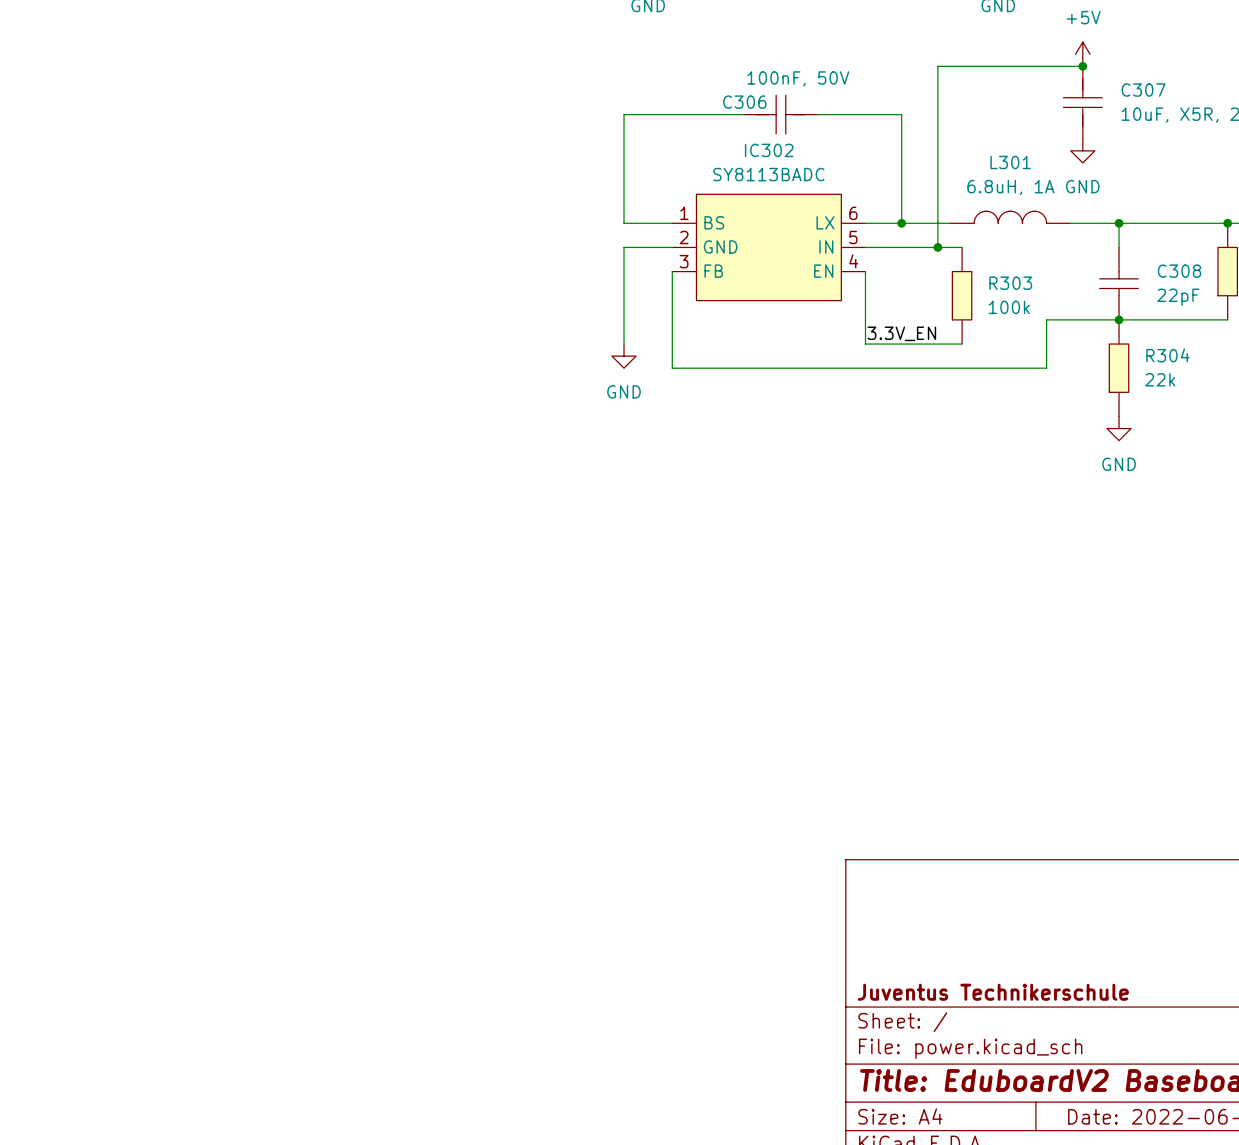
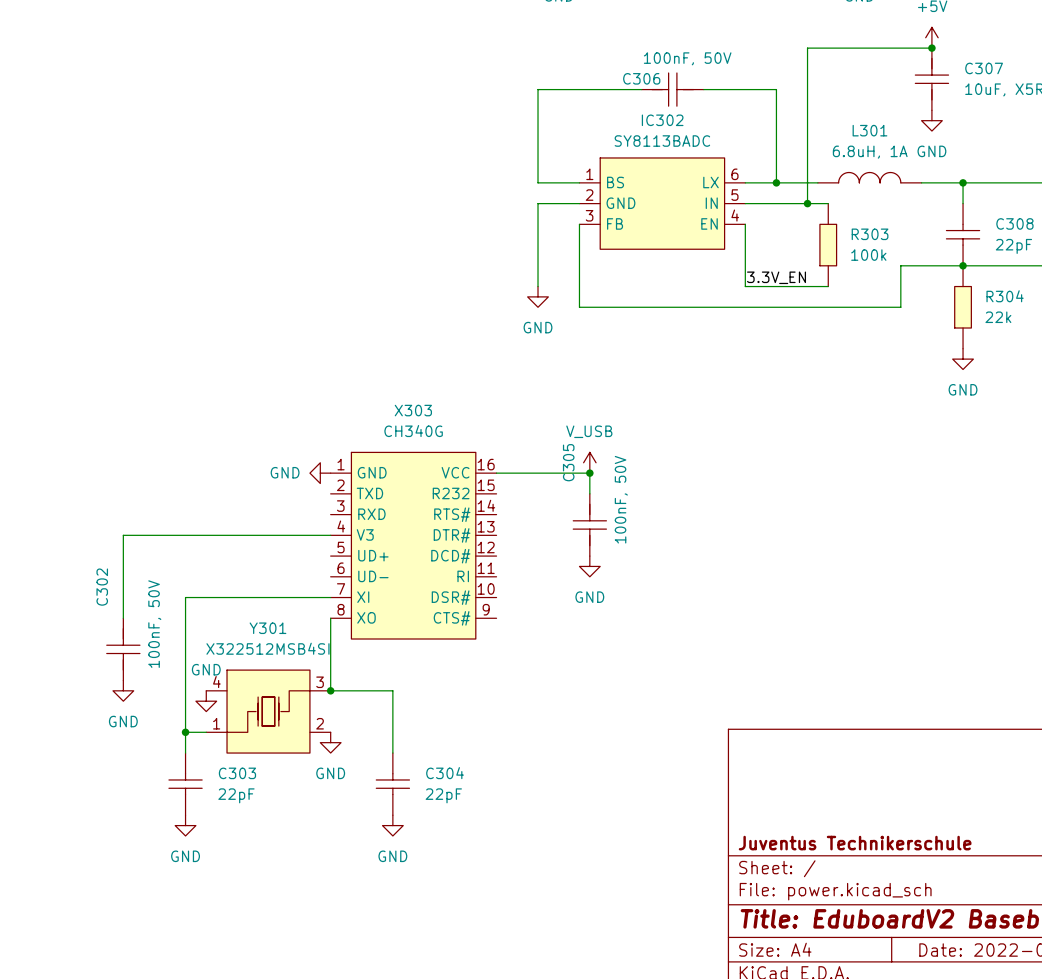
power symbol: none -> V_USB (589, 462)
power symbol: none -> GND (320, 473)
wire: none -> (496, 473) (589, 473) (589, 493)
junction: none -> (589, 473)
C305: none -> 100nF, 50V (589, 524)
wire: none -> (330, 535) (123, 535) (123, 618)
X303: none -> CH340G (413, 545)
power symbol: none -> GND (589, 566)
wire: none -> (330, 597) (185, 597) (185, 753)
wire: none -> (330, 618) (330, 690) (392, 690) (392, 753)
C302: none -> 100nF, 50V (123, 649)
power symbol: none -> GND (123, 690)
junction: none -> (330, 690)
power symbol: none -> GND (206, 701)
Y301: none -> X322512MSB4SI (268, 711)
wire: none -> (185, 732) (206, 732)
junction: none -> (185, 732)
power symbol: none -> GND (330, 742)
C303: none -> 22pF (185, 784)
C304: none -> 22pF (392, 784)
power symbol: none -> GND (185, 825)
power symbol: none -> GND (392, 825)

